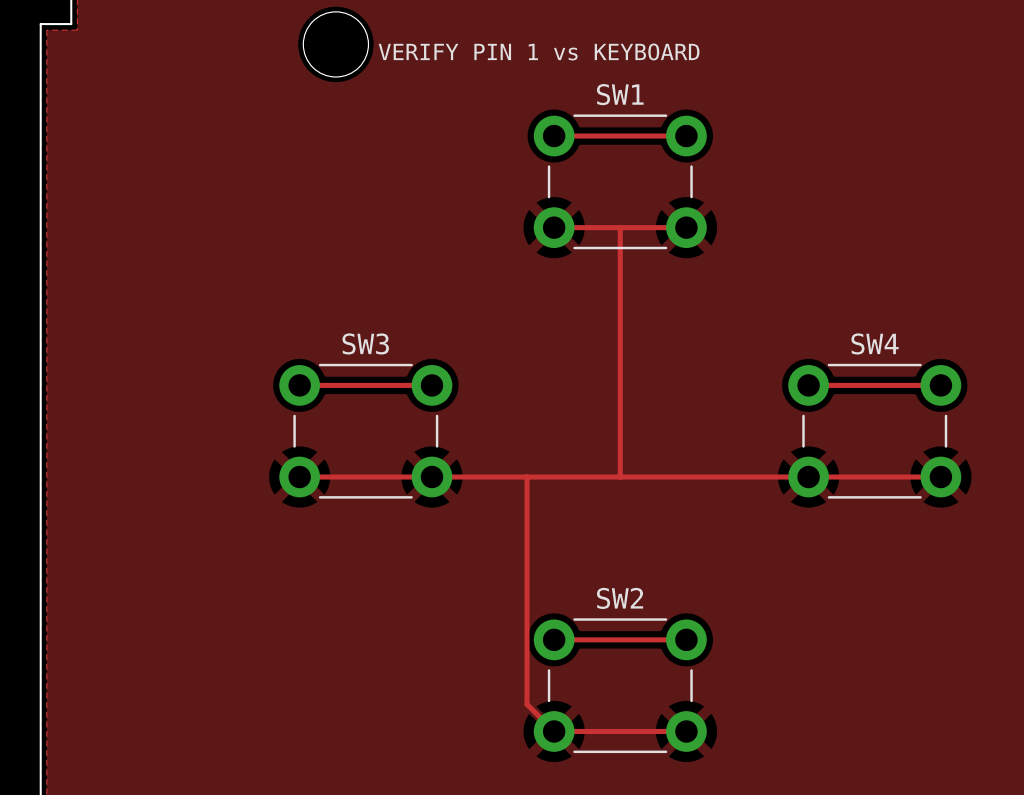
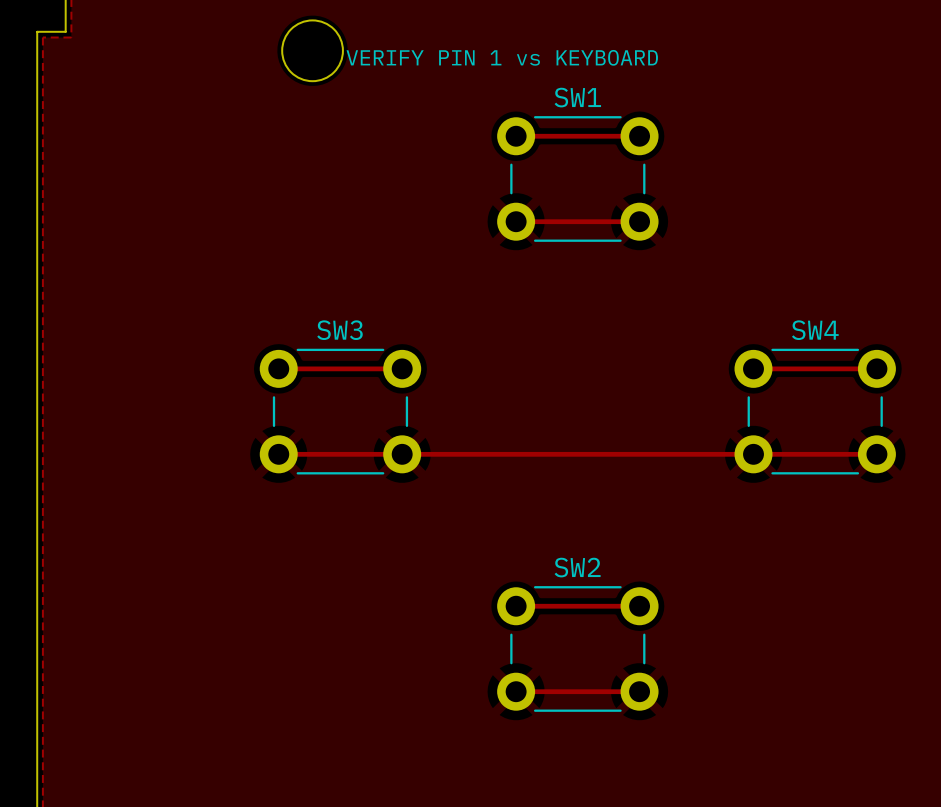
track: (620, 227) (620, 477) -> none
track: (527, 477) (527, 704) (554, 731) -> none

